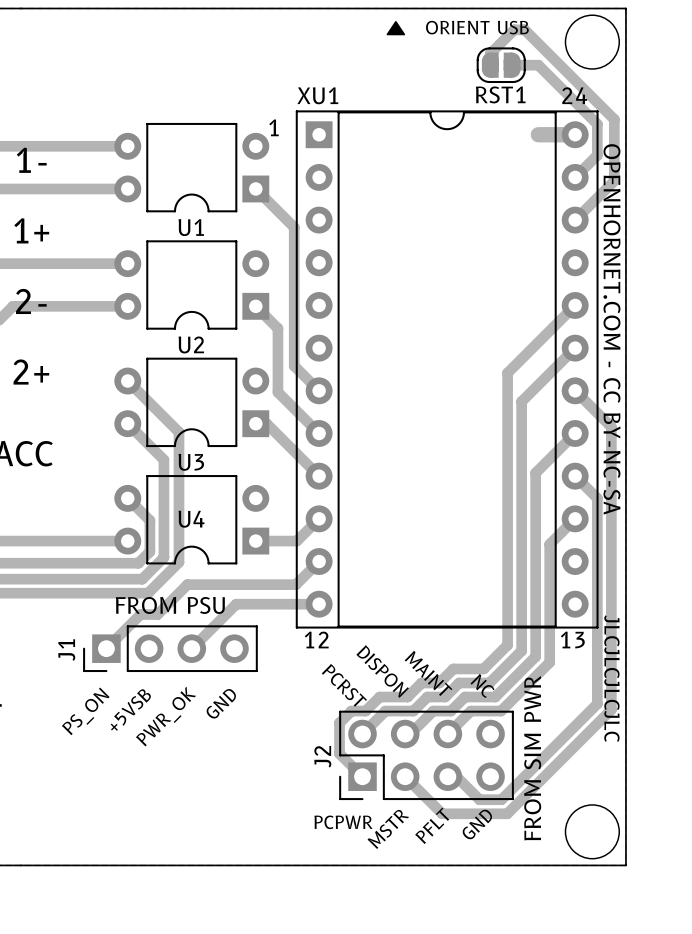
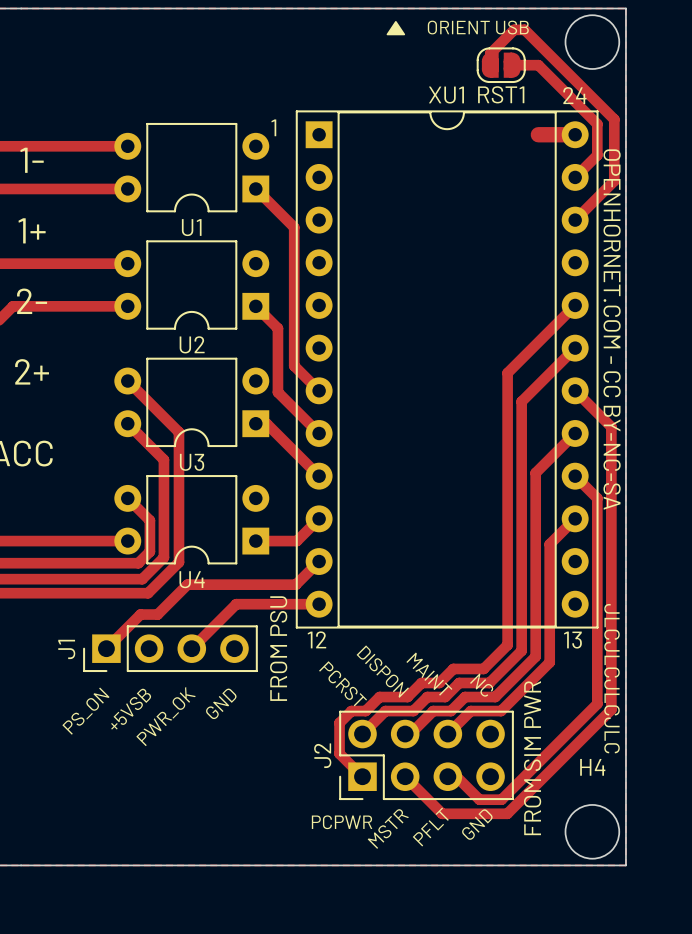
XU1 name position: XU1 (317, 95) -> XU1 (446, 95)
U4 name position: U4 (191, 519) -> U4 (192, 579)
J1 value rotation: 0° (170, 605) -> 90° counterclockwise (278, 648)
H4 name: none -> H4 (592, 767)

